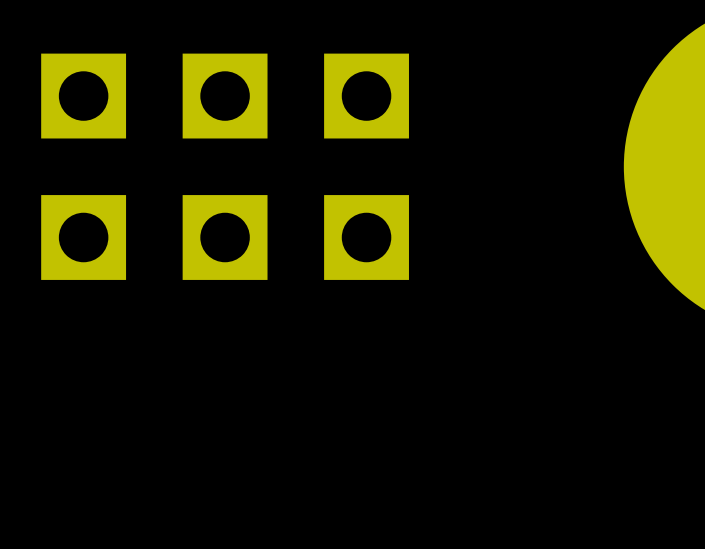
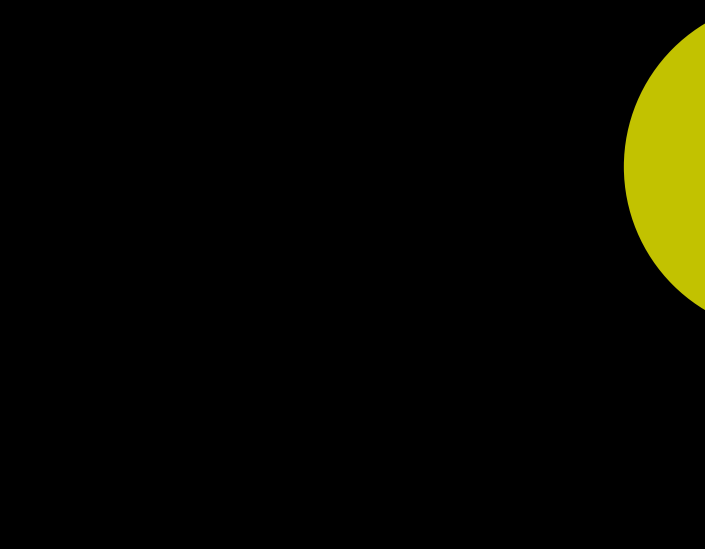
part: (225, 166) -> none

